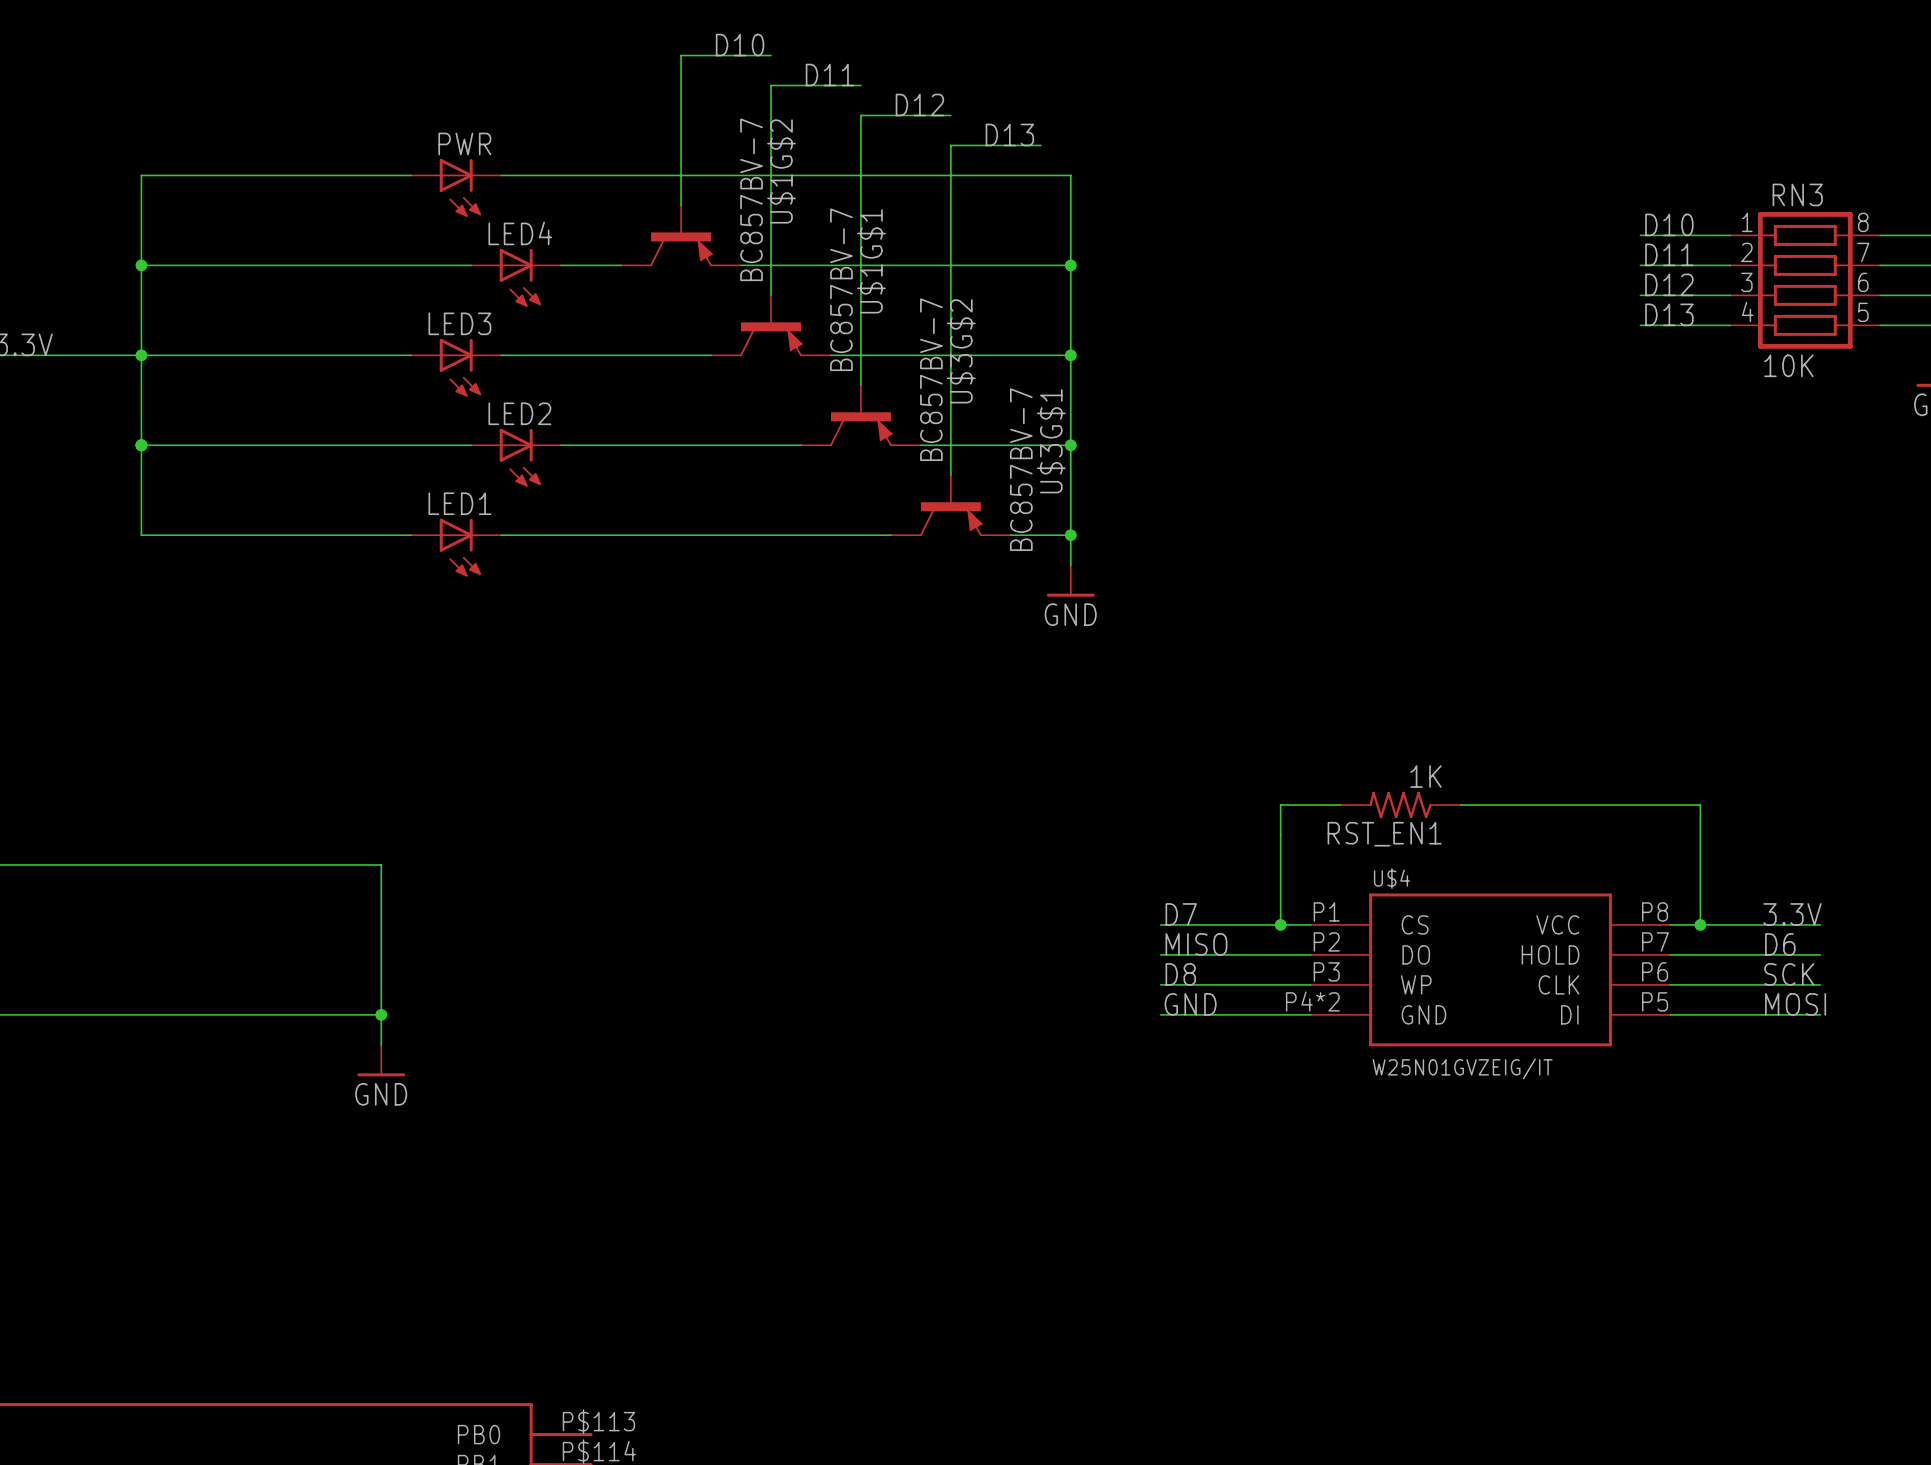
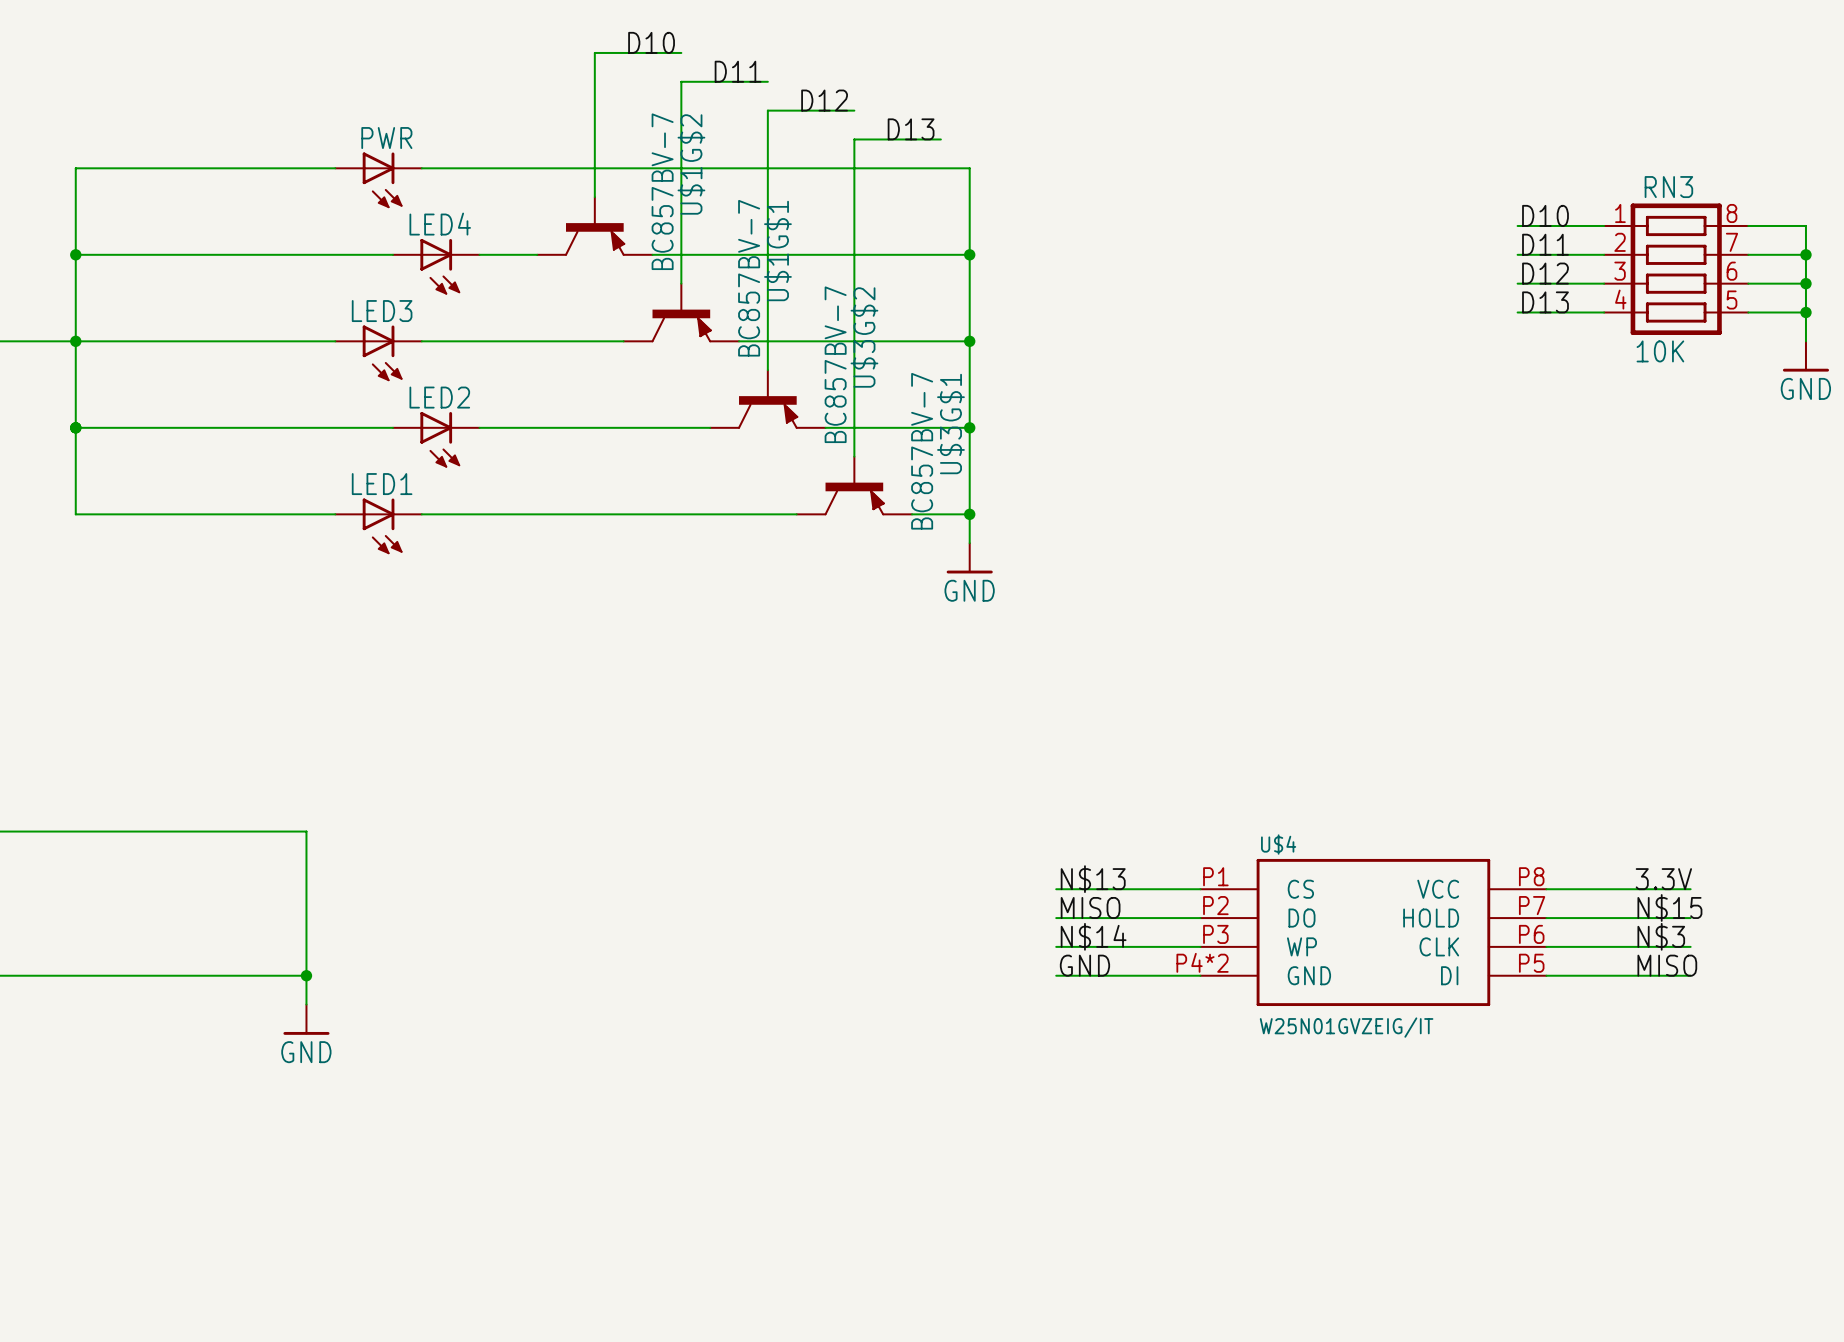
wire: (1340, 805) (1280, 805) (1280, 924) -> none
RST_EN1: 1K (1400, 805) -> none
wire: (1460, 805) (1700, 805) (1700, 924) -> none
label: D7 (1181, 914) -> N$13 (1093, 879)
junction: (1280, 924) -> none
junction: (1700, 924) -> none
label: D6 (1780, 944) -> N$15 (1669, 907)
label: D8 (1180, 974) -> N$14 (1093, 936)
label: SCK (1789, 974) -> N$3 (1661, 936)
label: MOSI (1795, 1004) -> MISO (1667, 965)

